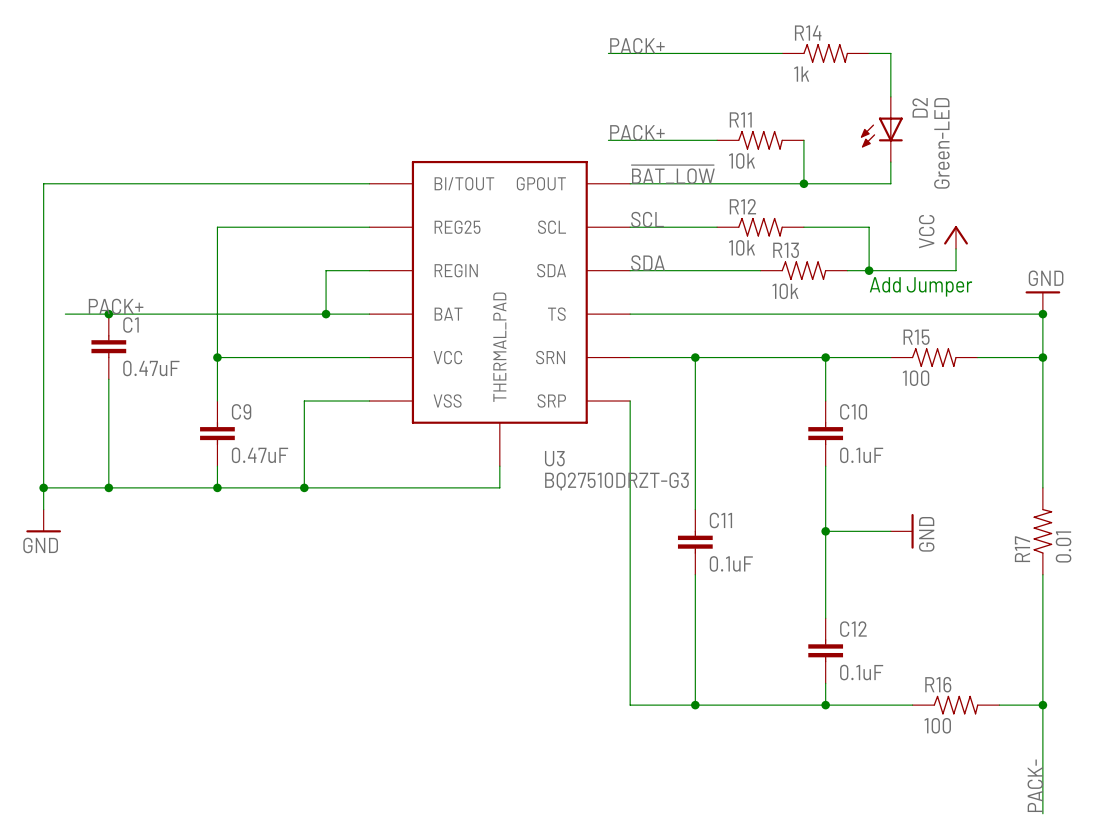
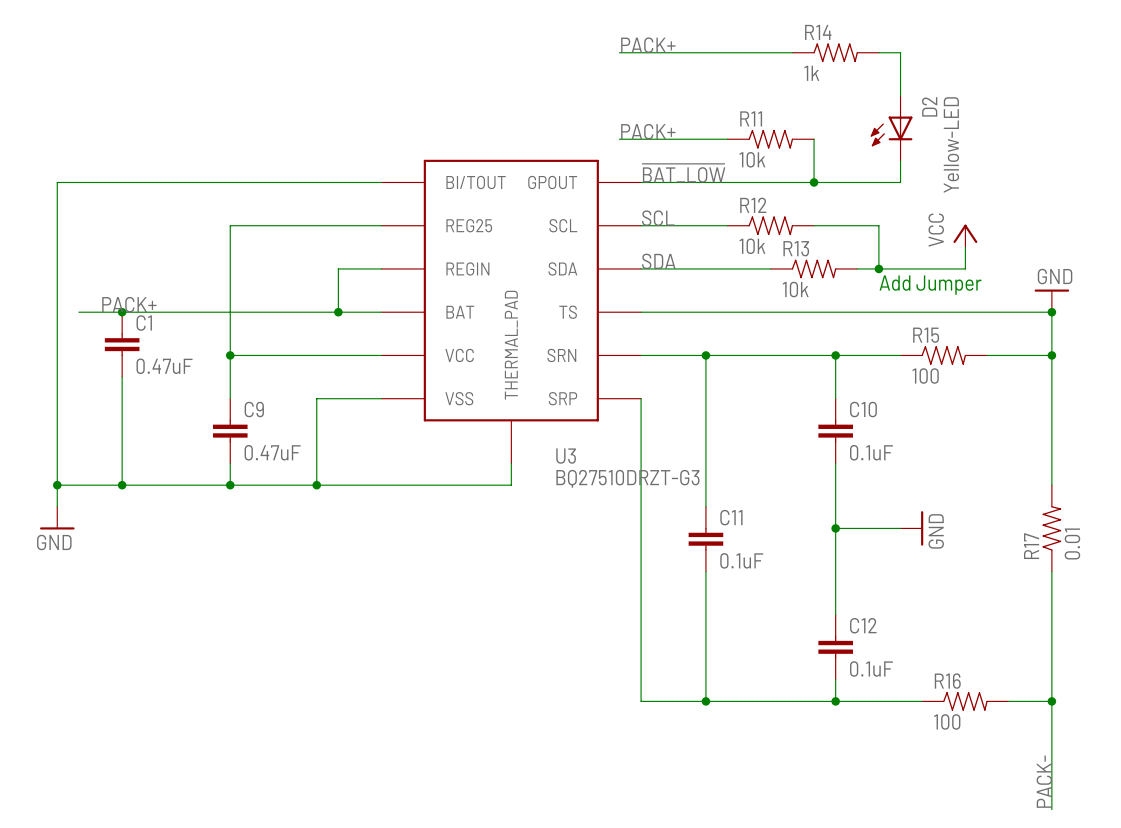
D2 value: Green-LED (941, 143) -> Yellow-LED (951, 144)

